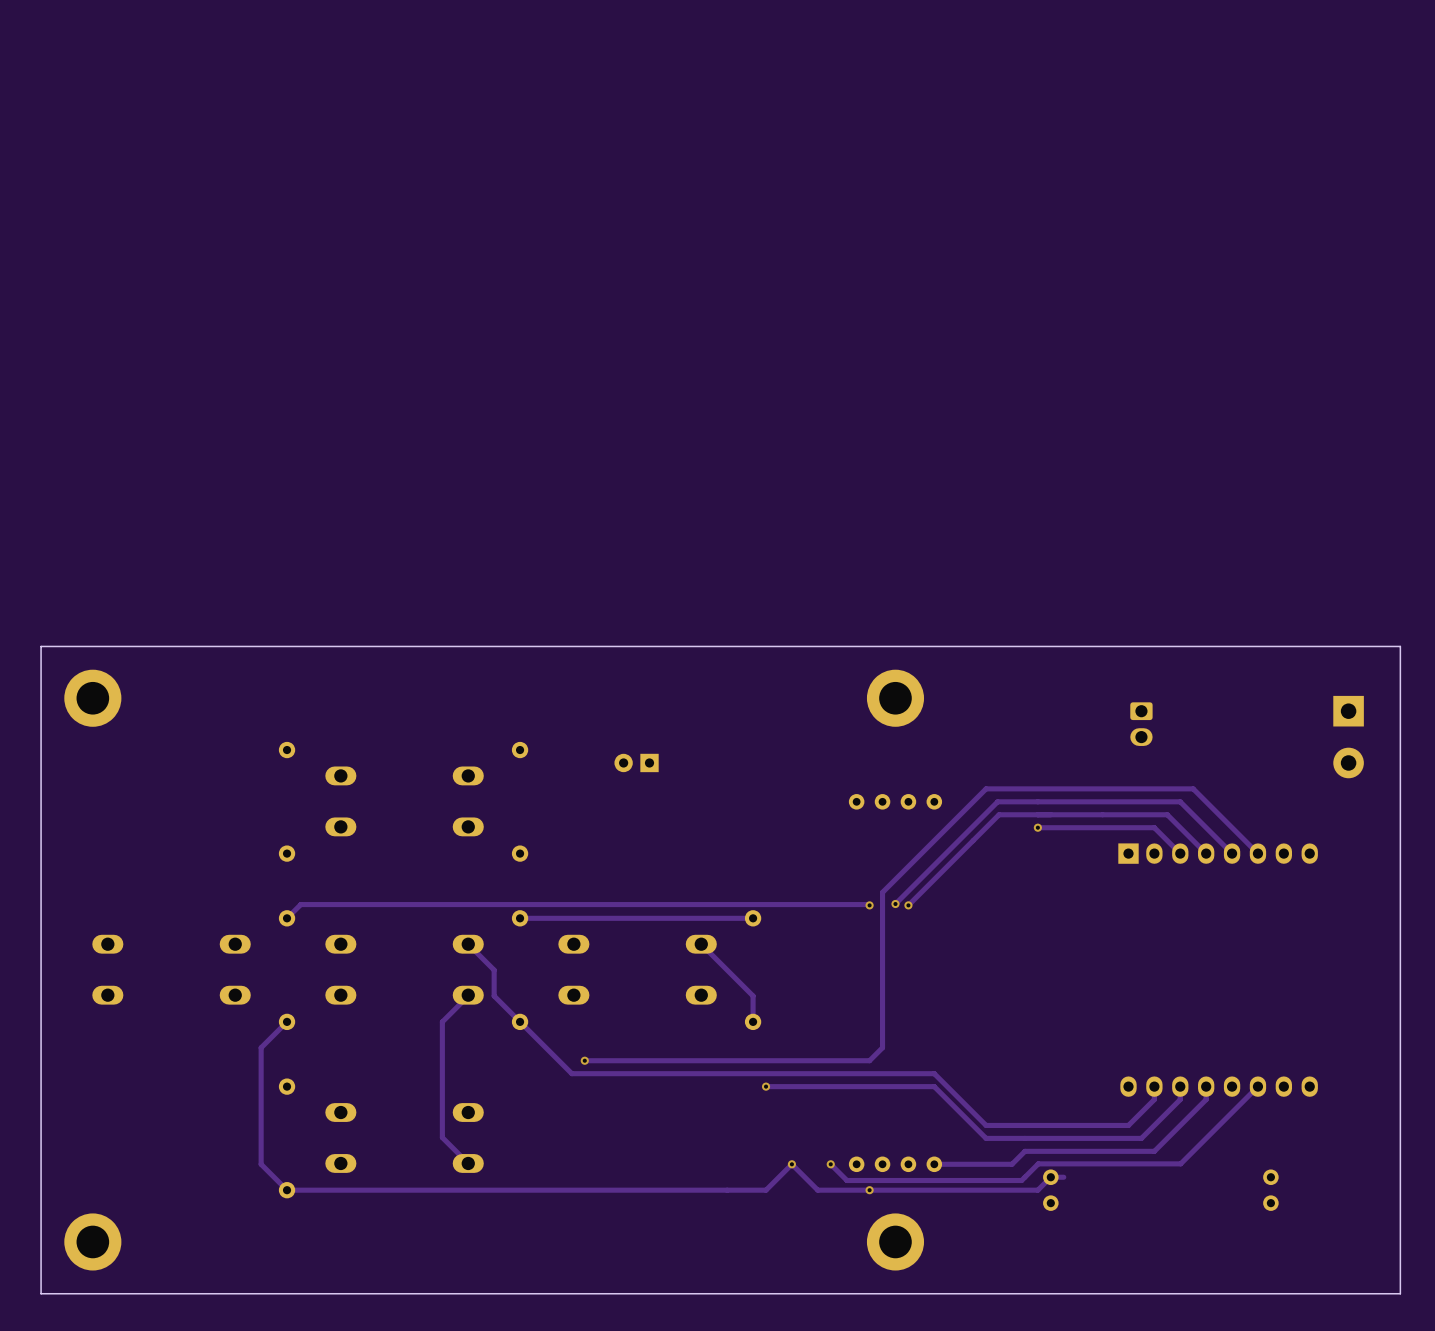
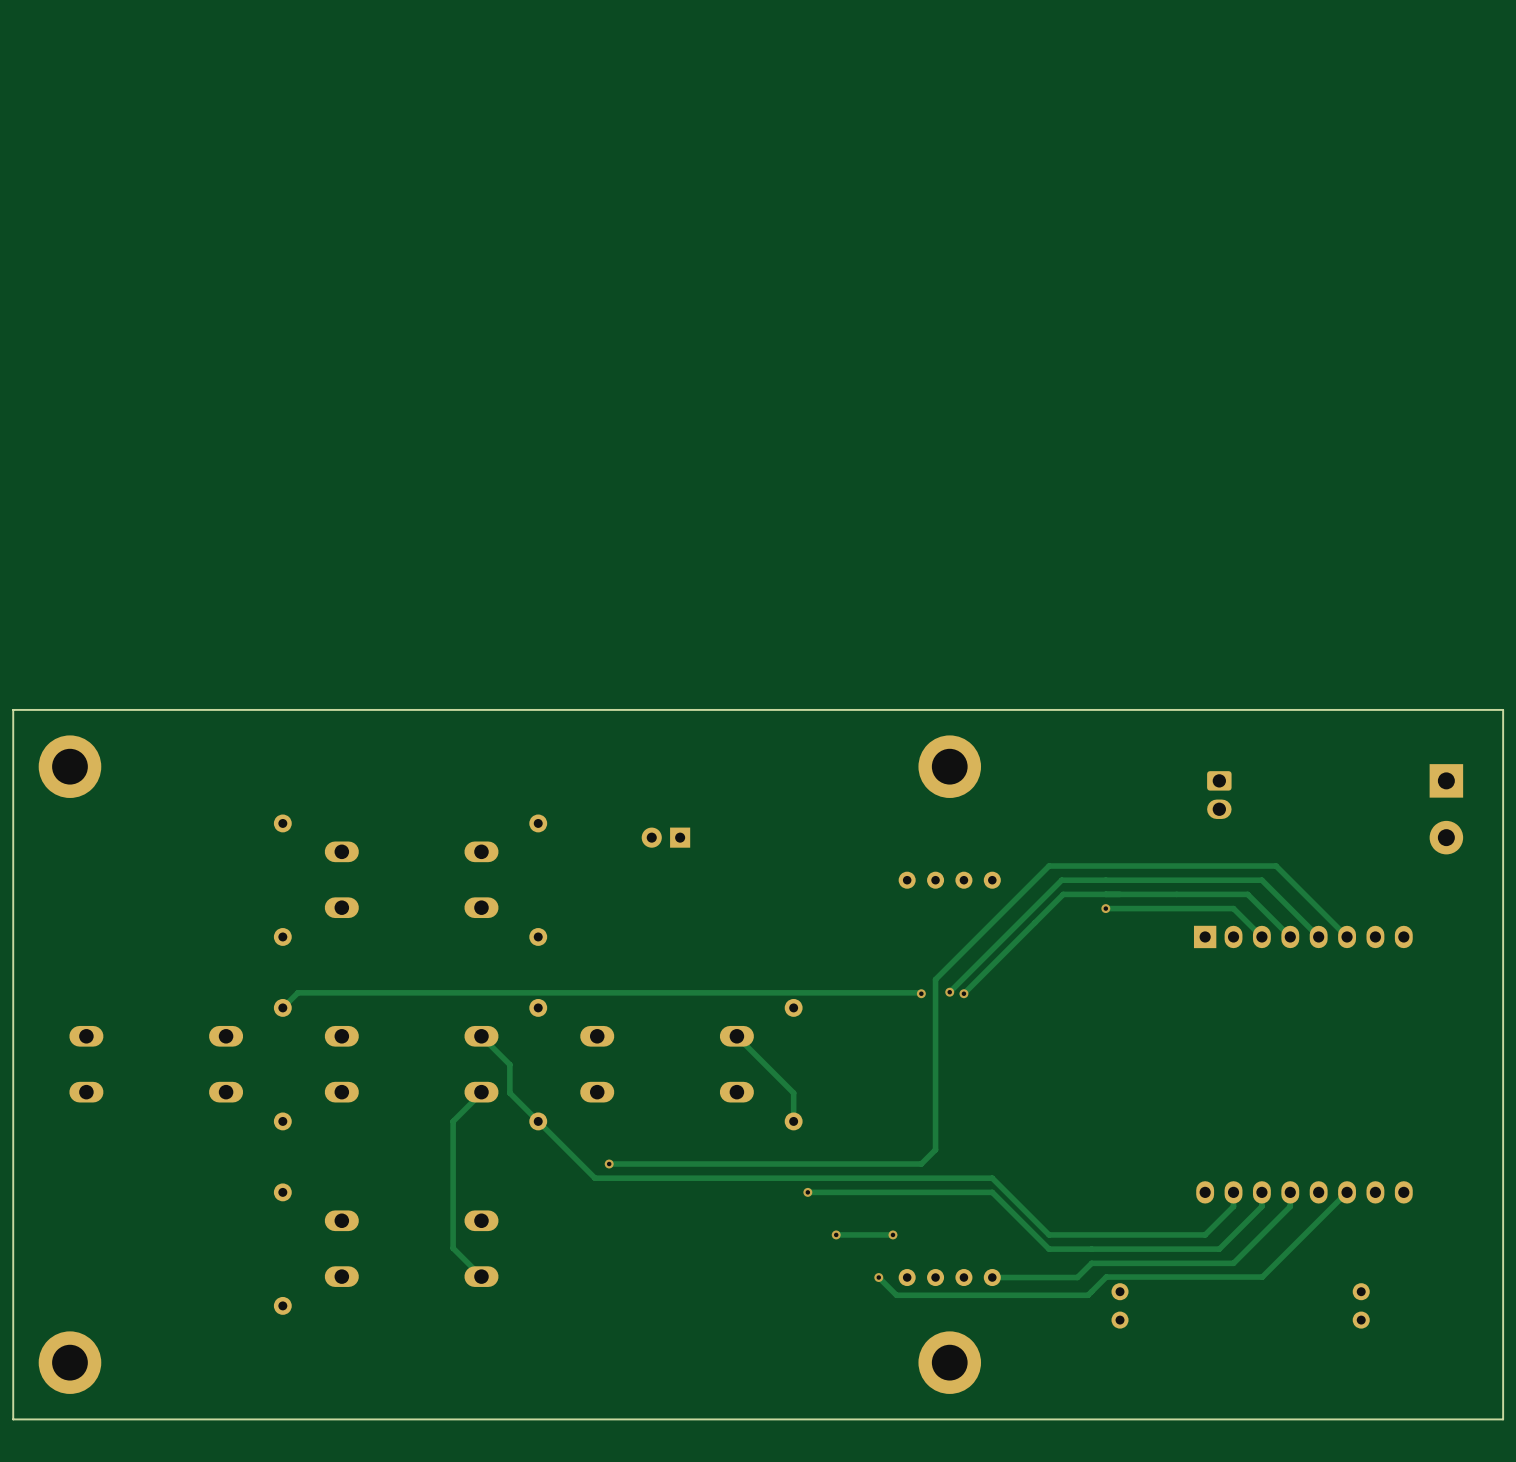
track: (753, 918) (520, 918) -> none
track: (287, 1021) (261, 1047) (261, 1164) (287, 1190) (766, 1190) (791, 1164) (817, 1190) (1037, 1190) (1050, 1177) (1063, 1177) -> none
via: none -> (836, 1234)
track: none -> (892, 1234) (836, 1234)
via: none -> (892, 1234)
via: (791, 1164) -> none
via: (869, 1190) -> none

